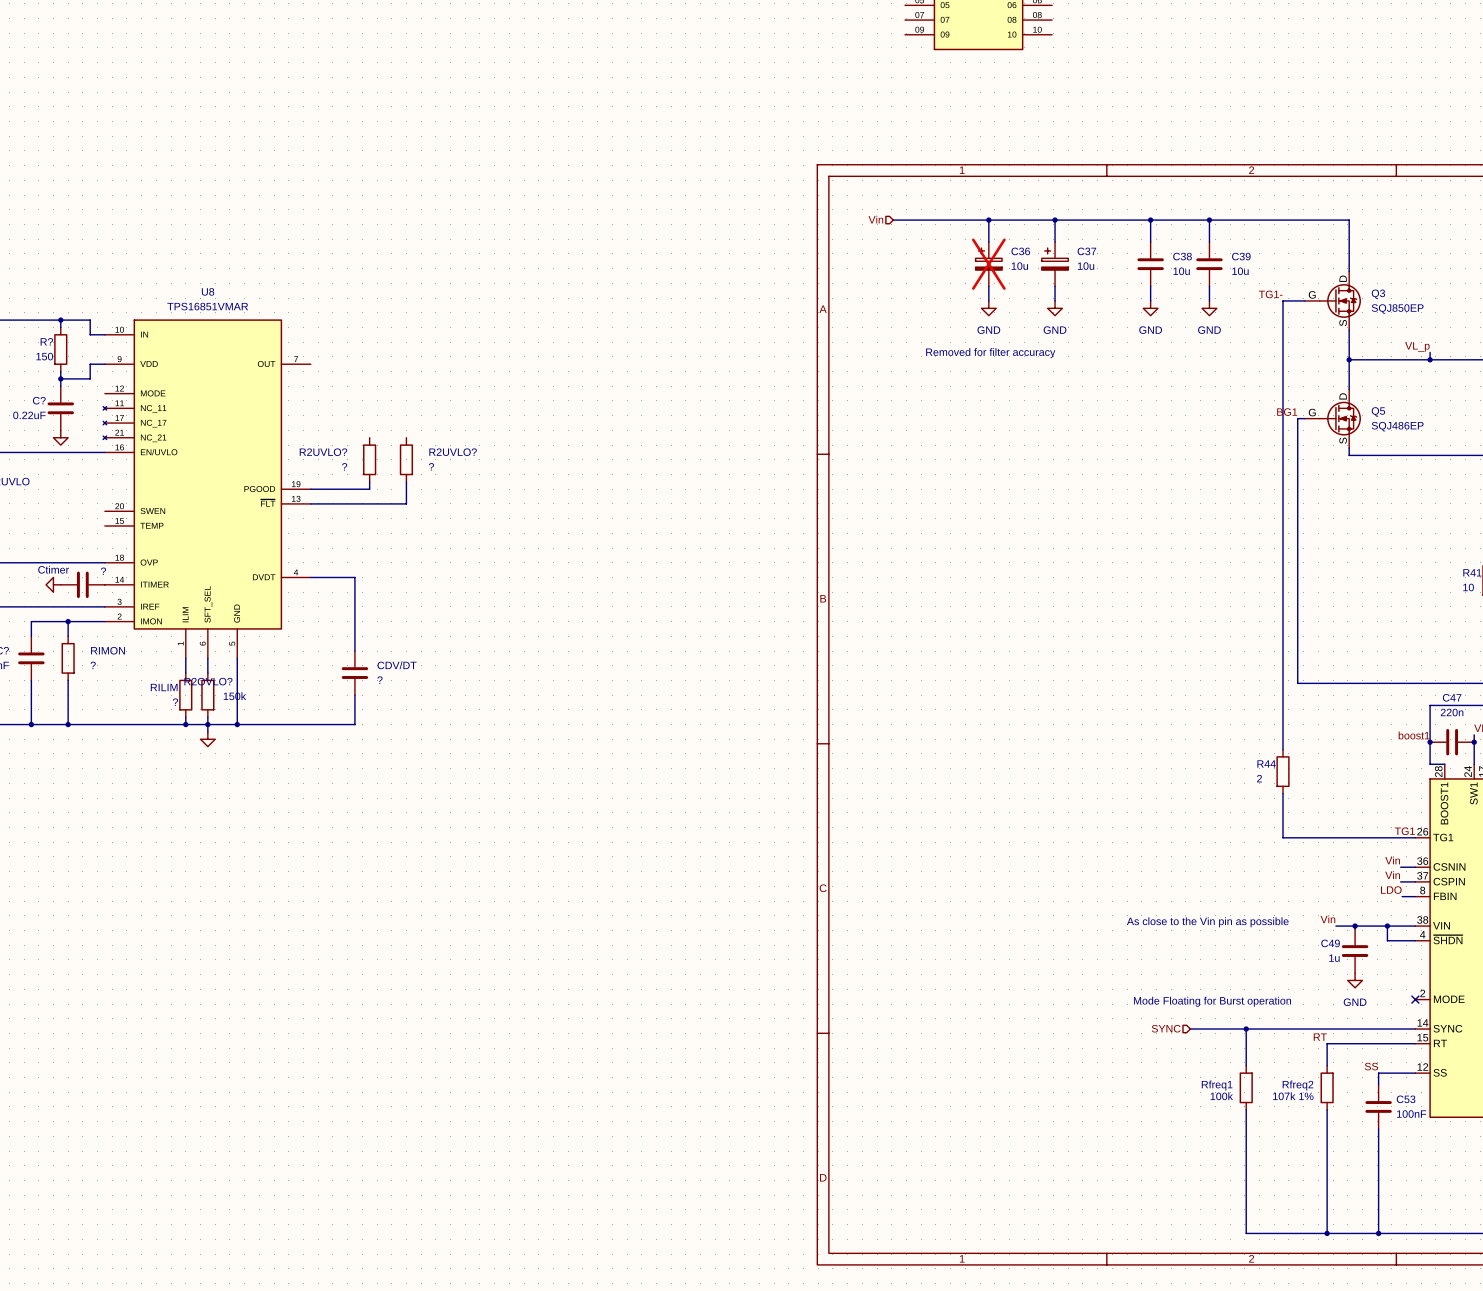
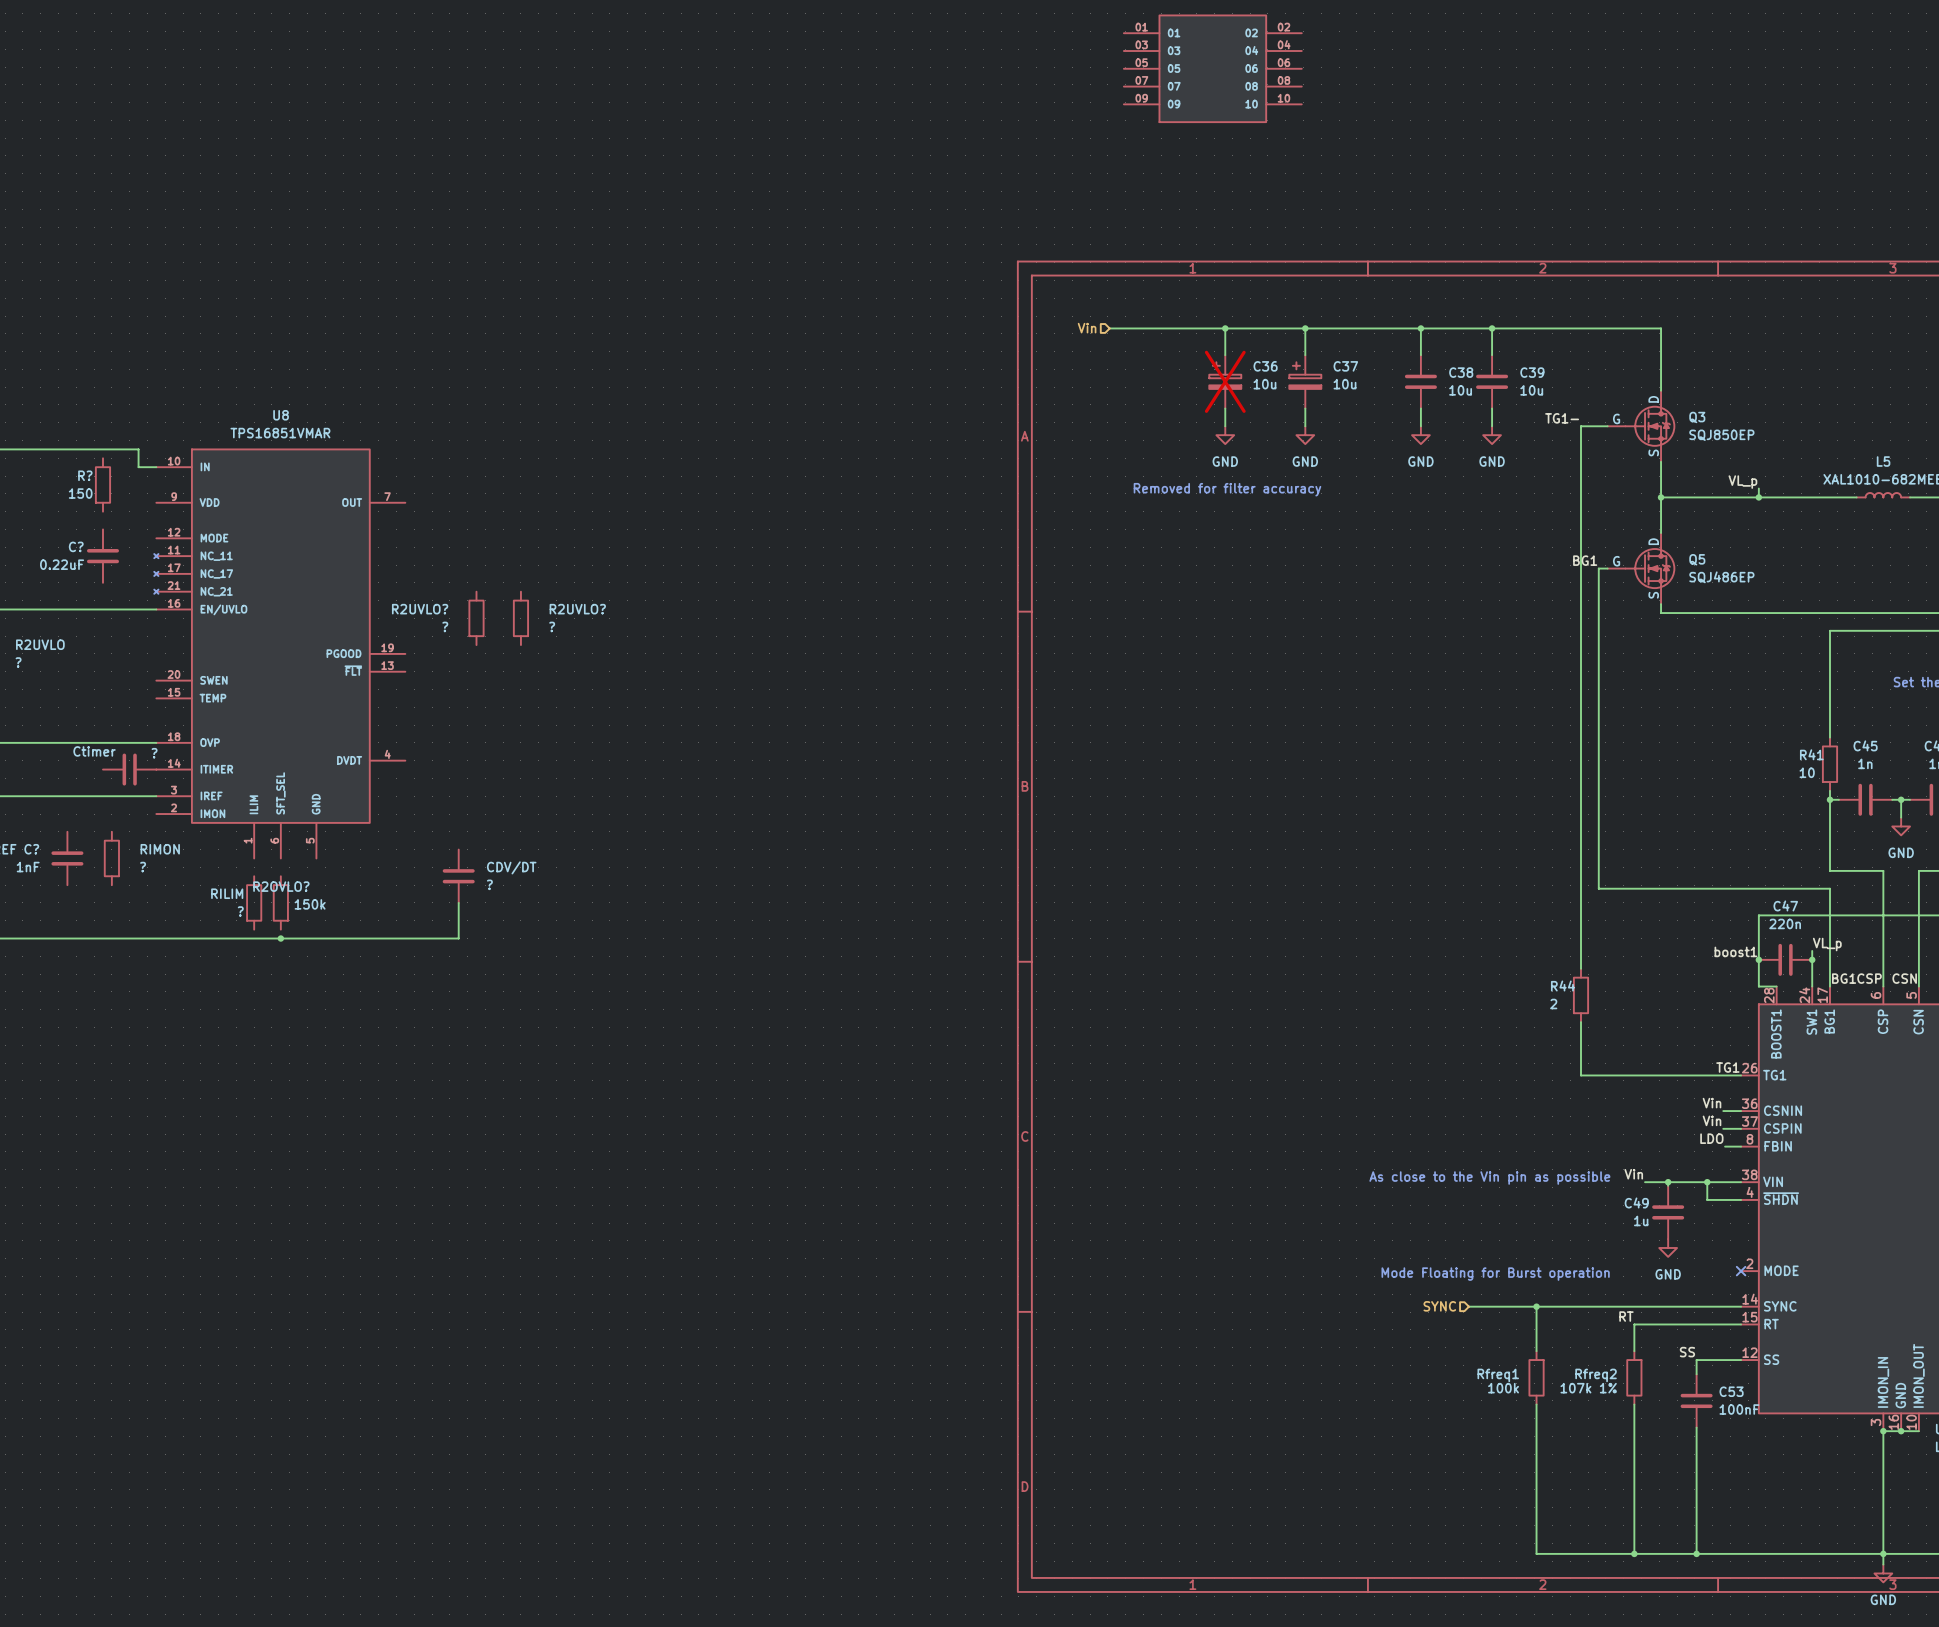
wire: (60, 320) (60, 327) -> none
junction: (60, 320) -> none
wire: (104, 364) (90, 364) (90, 378) (60, 378) -> none
wire: (60, 371) (60, 386) -> none
junction: (60, 378) -> none
power symbol: (60, 437) -> none
wire: (369, 481) (369, 489) (310, 489) -> none
wire: (406, 481) (406, 503) (310, 503) -> none
wire: (310, 577) (354, 577) (354, 651) -> none
power symbol: (53, 584) -> none
wire: (68, 621) (68, 636) -> none
junction: (68, 621) -> none
wire: (104, 621) (31, 621) (31, 636) -> none
wire: (185, 658) (185, 673) -> none
wire: (207, 658) (207, 673) -> none
wire: (237, 658) (237, 724) -> none
wire: (31, 680) (31, 724) -> none
wire: (68, 680) (68, 724) -> none
wire: (185, 717) (185, 724) -> none
wire: (207, 717) (207, 731) -> none
junction: (31, 724) -> none
junction: (68, 724) -> none
junction: (185, 724) -> none
junction: (237, 724) -> none
power symbol: (207, 739) -> none

